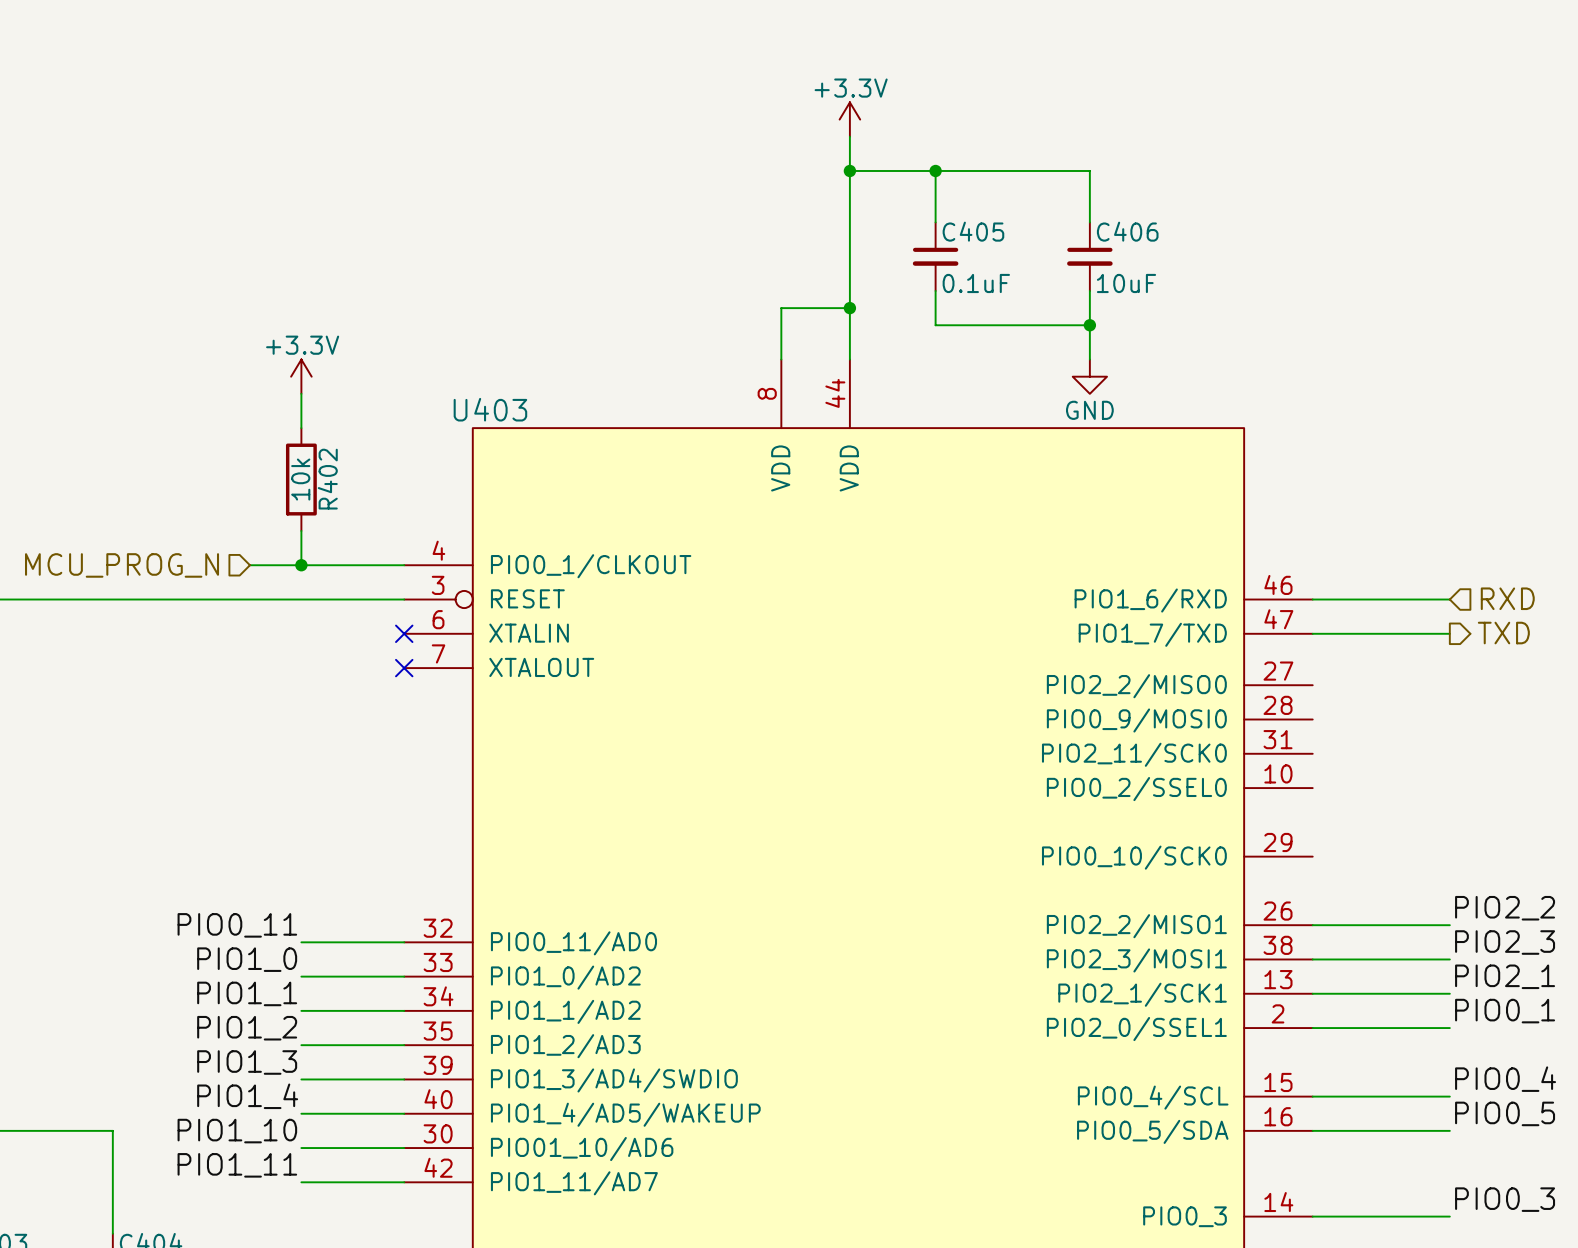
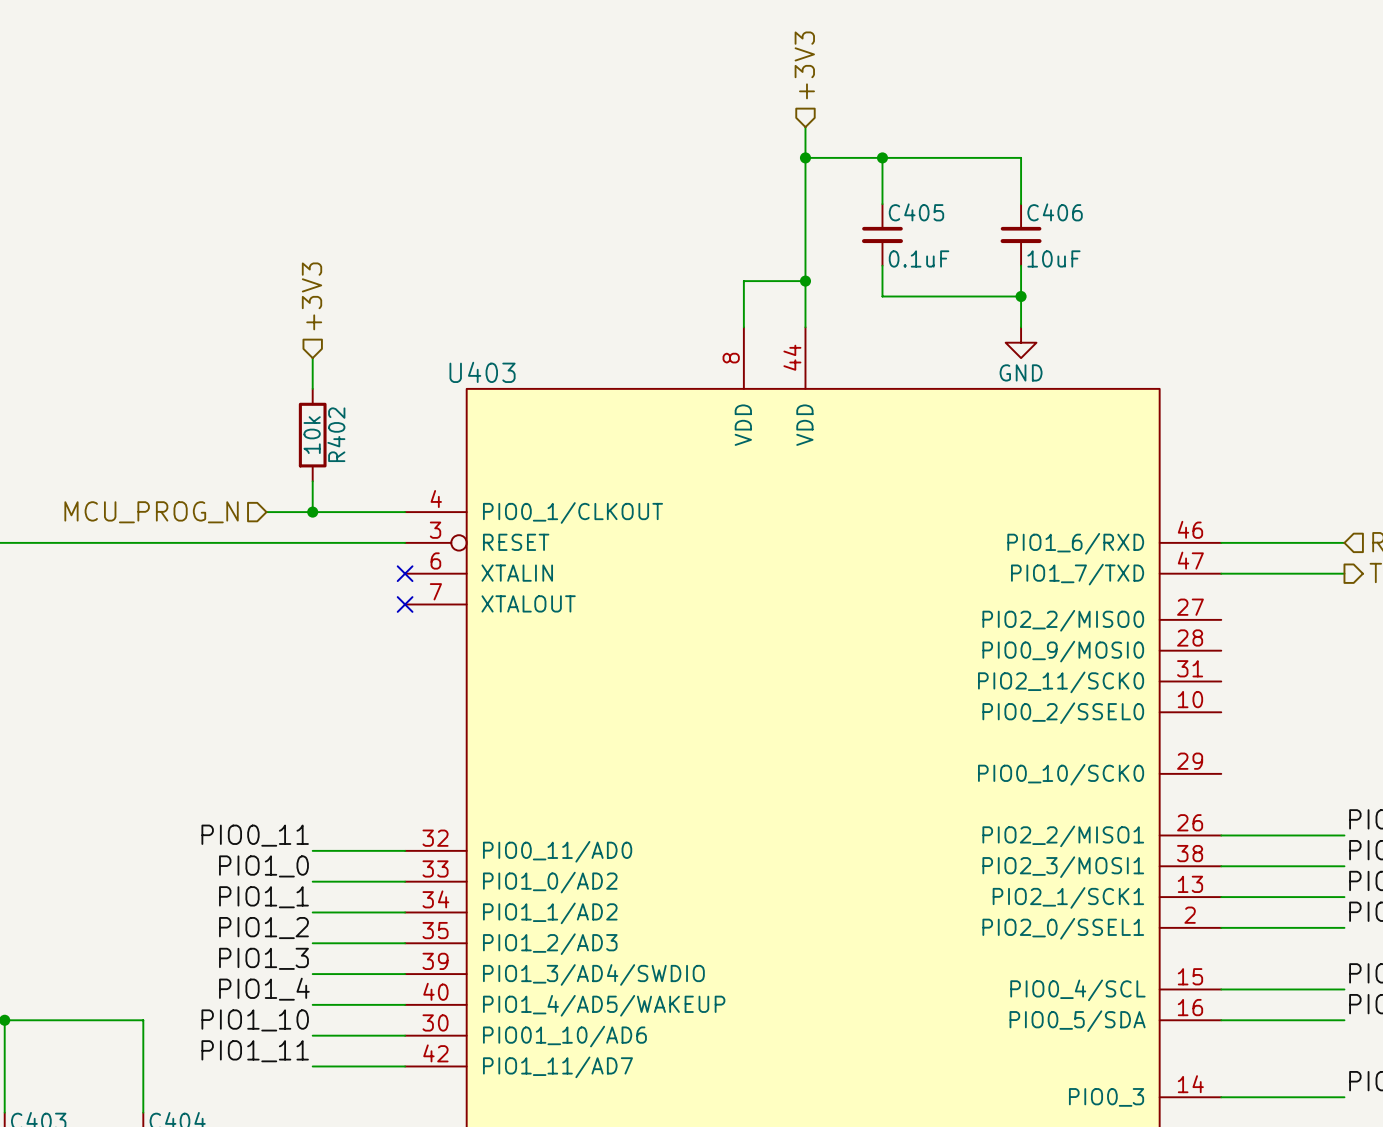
hierarchical label: none -> +3V3 (804, 65)
power symbol: +3.3V (849, 119) -> none
hierarchical label: none -> +3V3 (312, 296)
power symbol: +3.3V (301, 376) -> none

